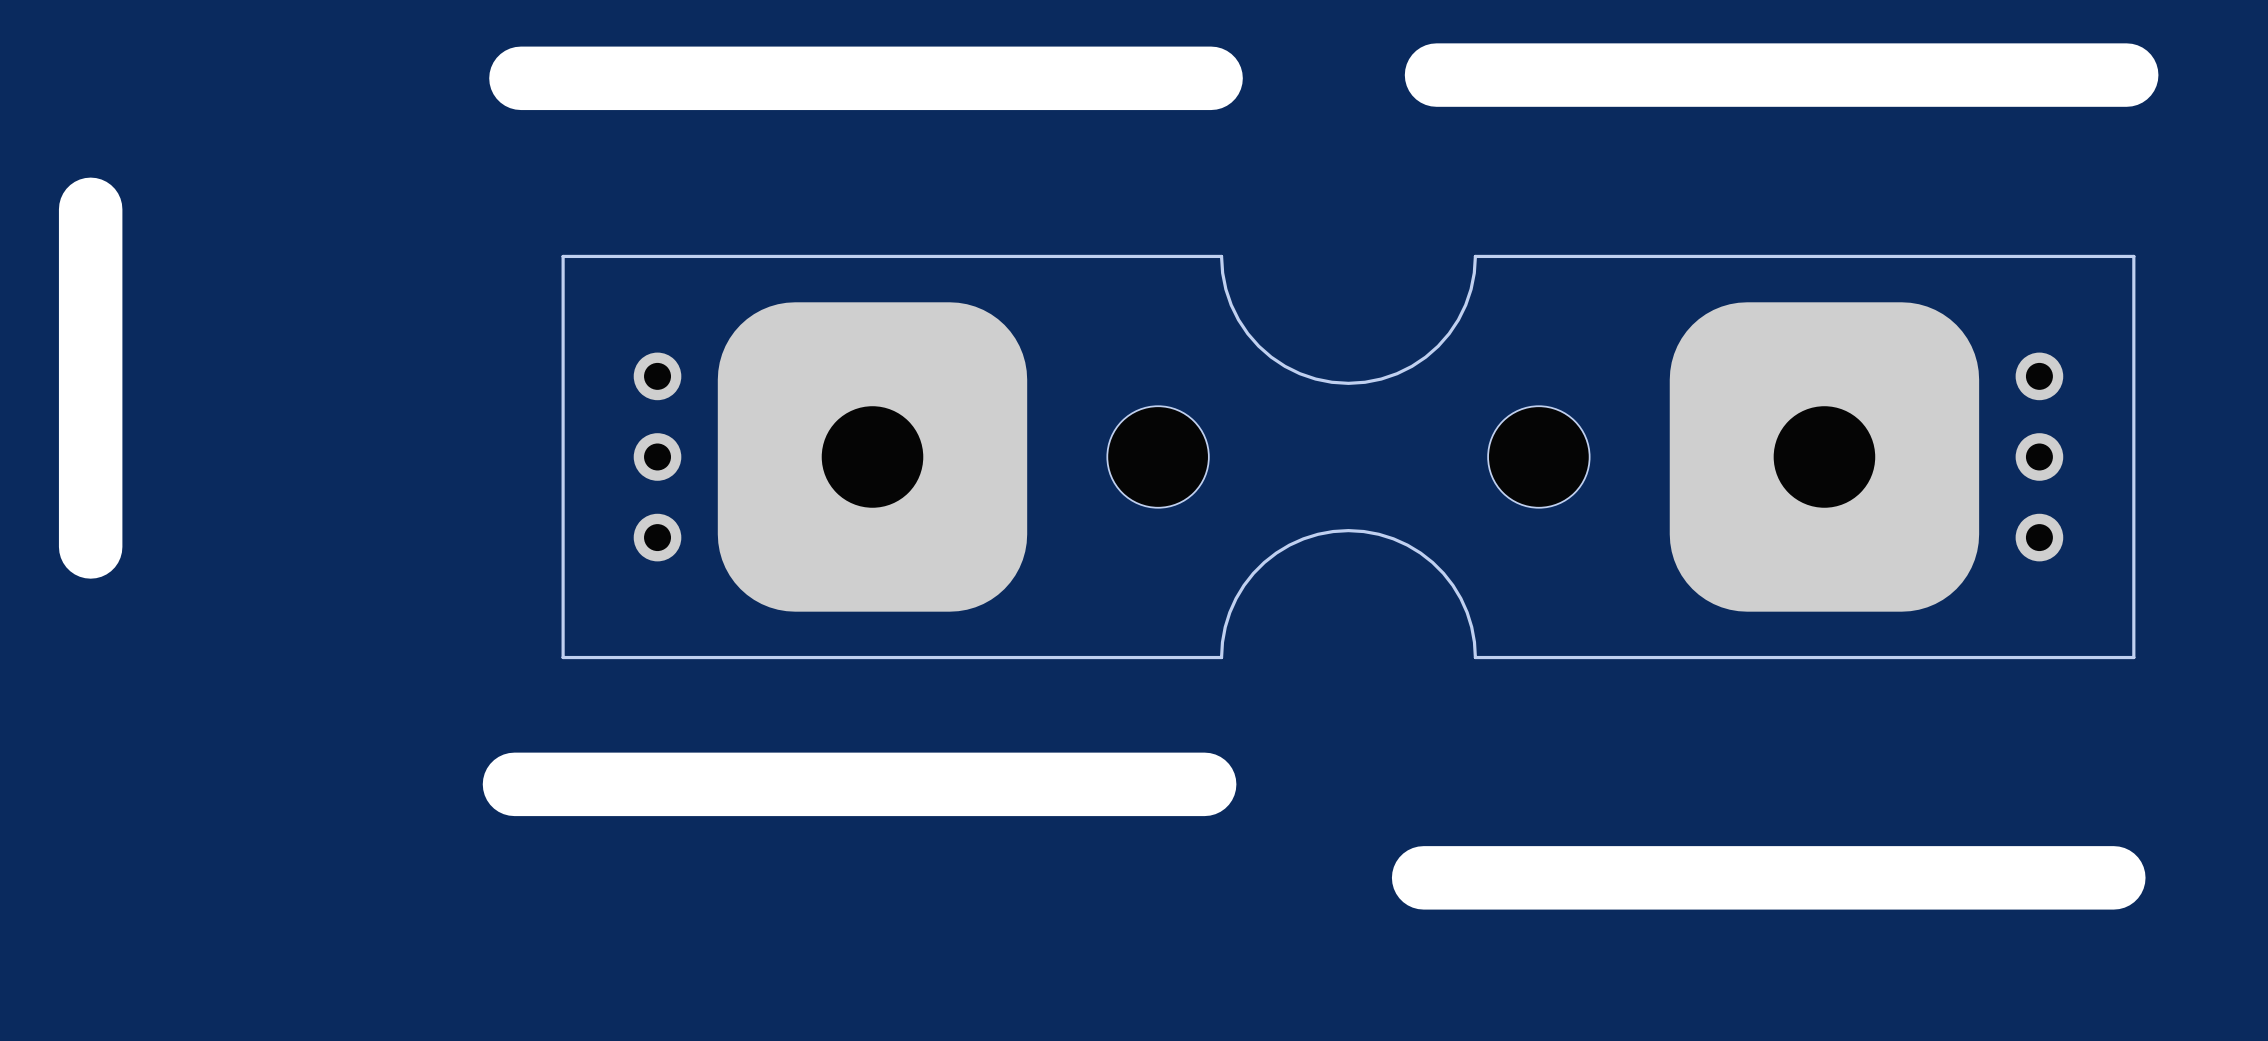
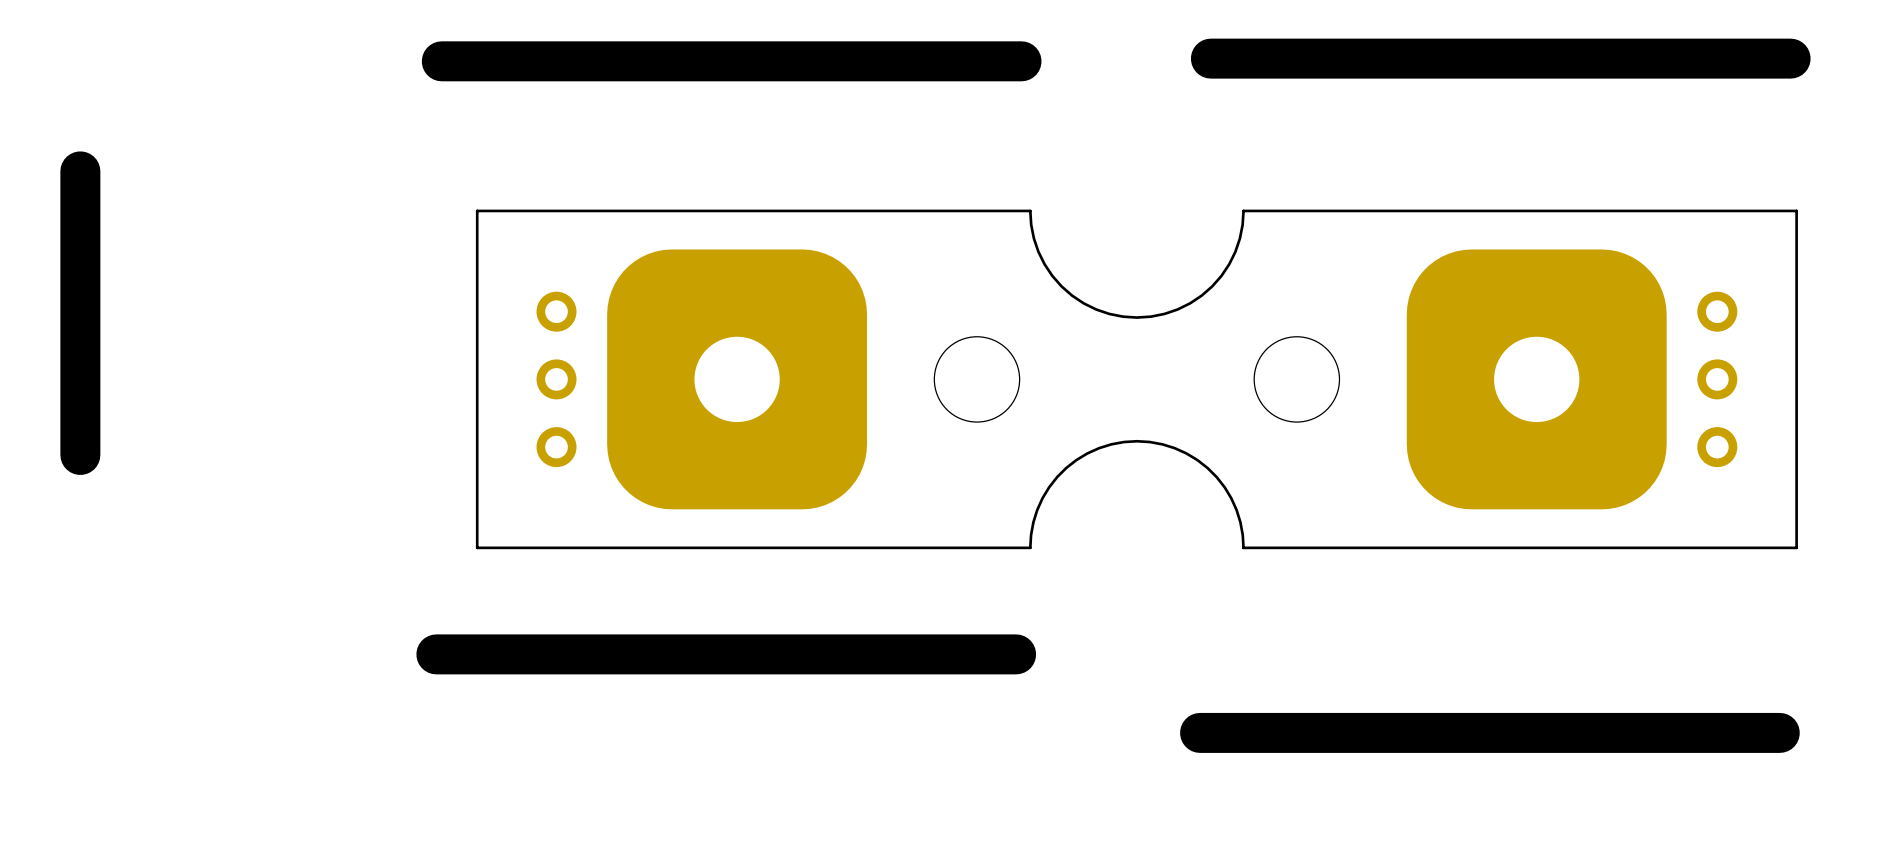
line width: thick (2126, 75) (1436, 75) -> thin (1790, 58) (1210, 58)
line width: thick (1211, 78) (520, 78) -> thin (1021, 61) (441, 61)
line width: thick (90, 209) (90, 546) -> thin (80, 171) (80, 454)
line width: thick (1204, 784) (514, 784) -> thin (1016, 654) (436, 654)
line width: thick (2113, 877) (1423, 877) -> thin (1779, 732) (1200, 732)

